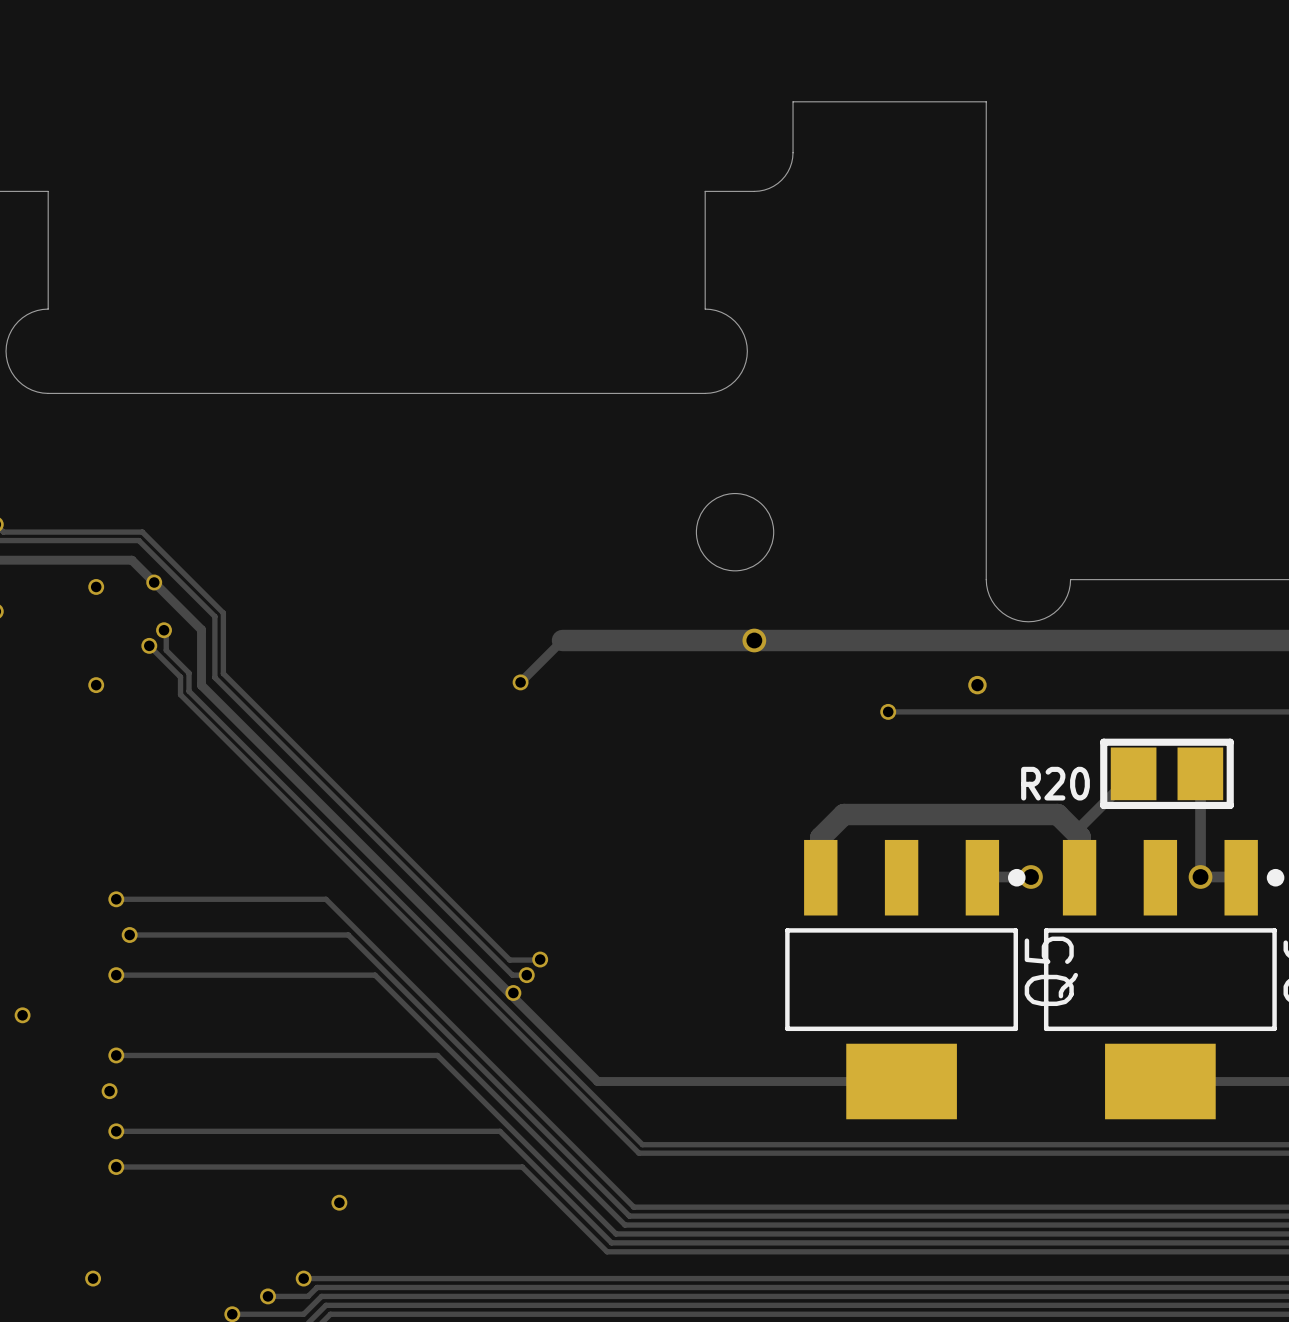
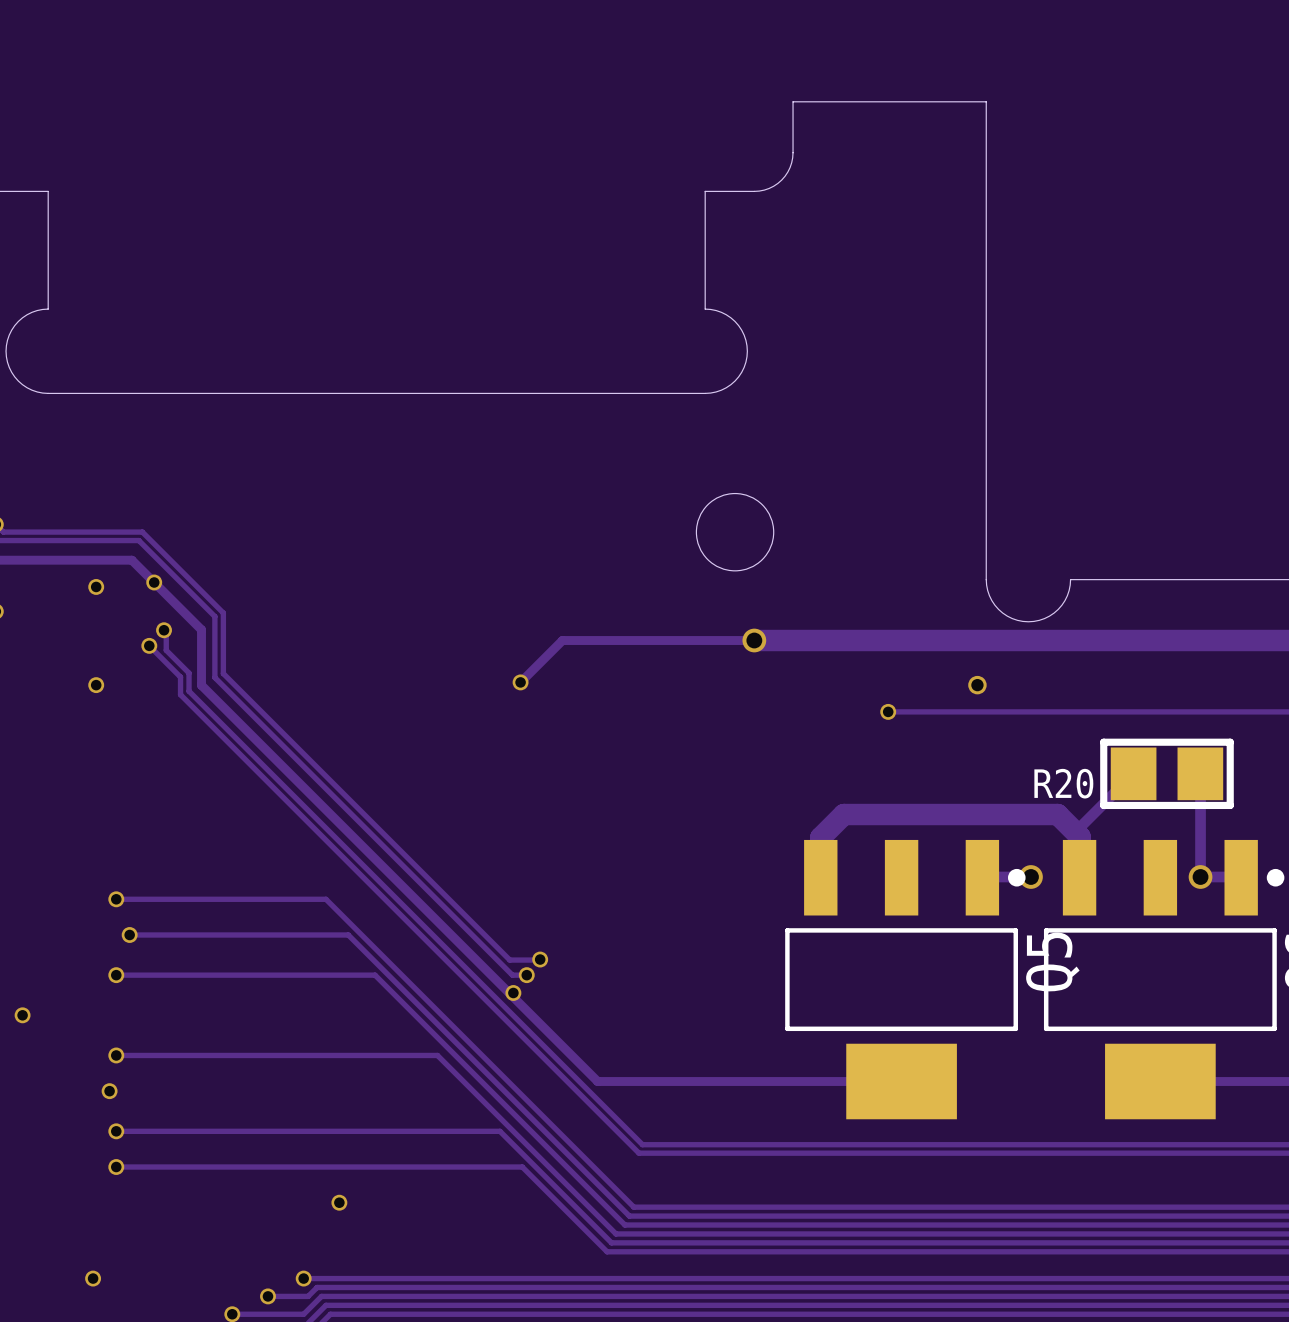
track width: thick (562, 640) (754, 640) -> thin (562, 640) (754, 640)

